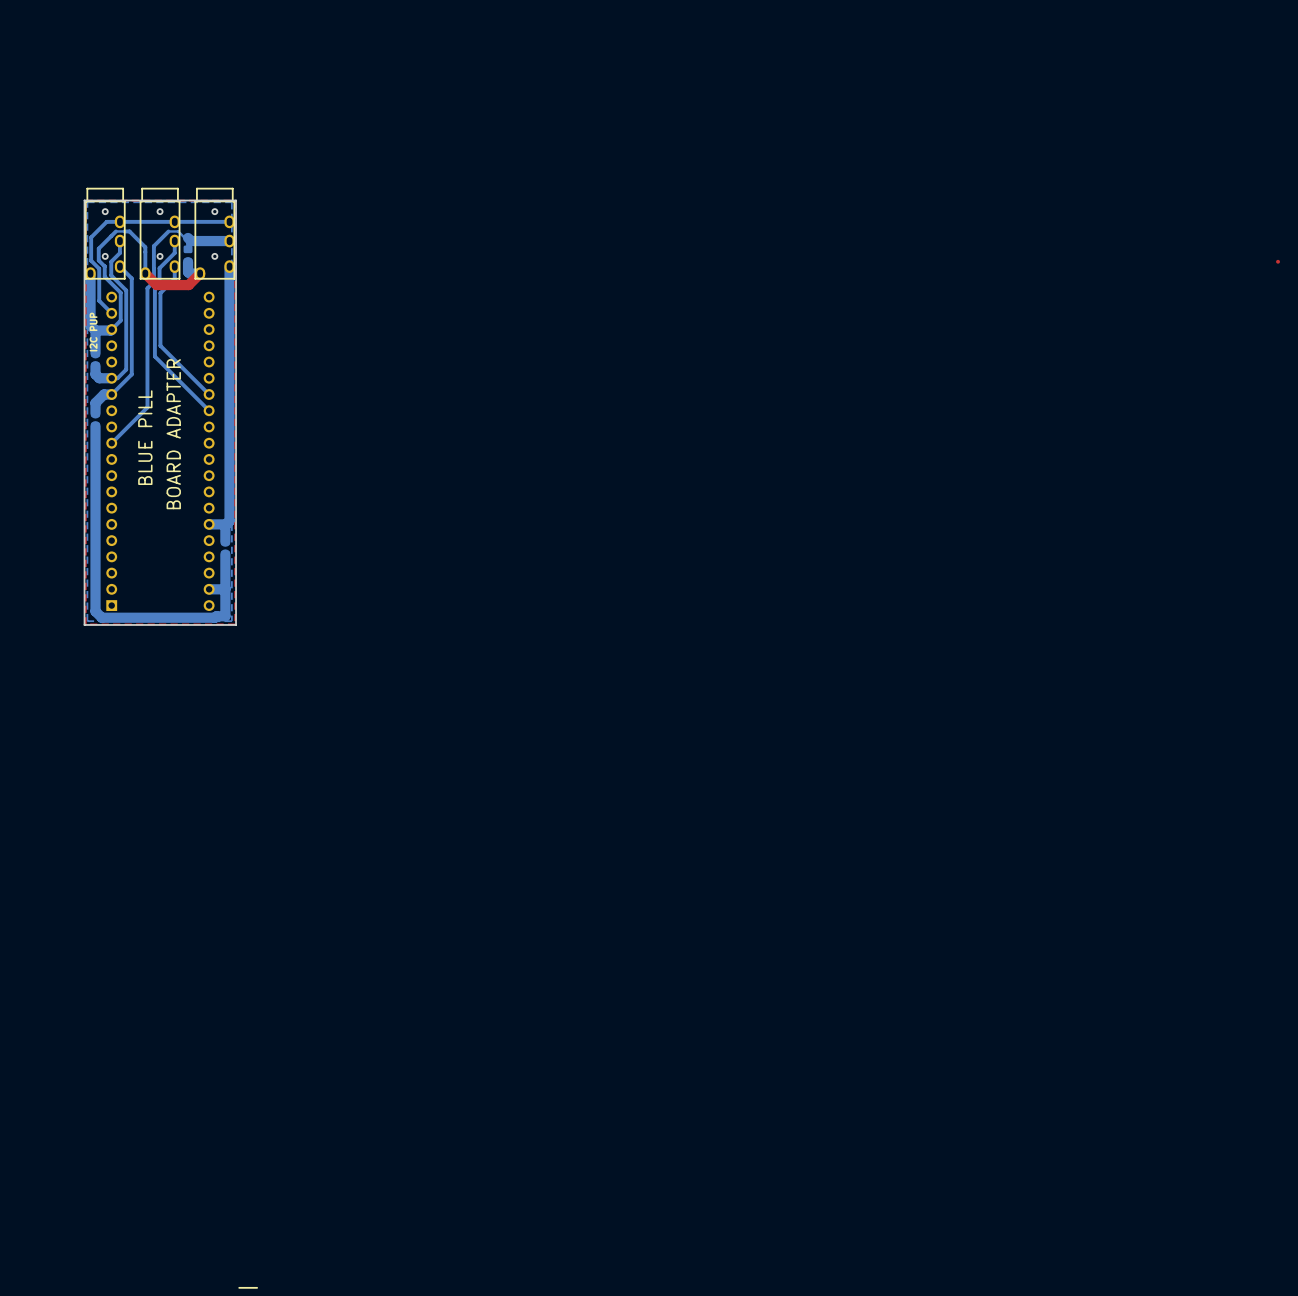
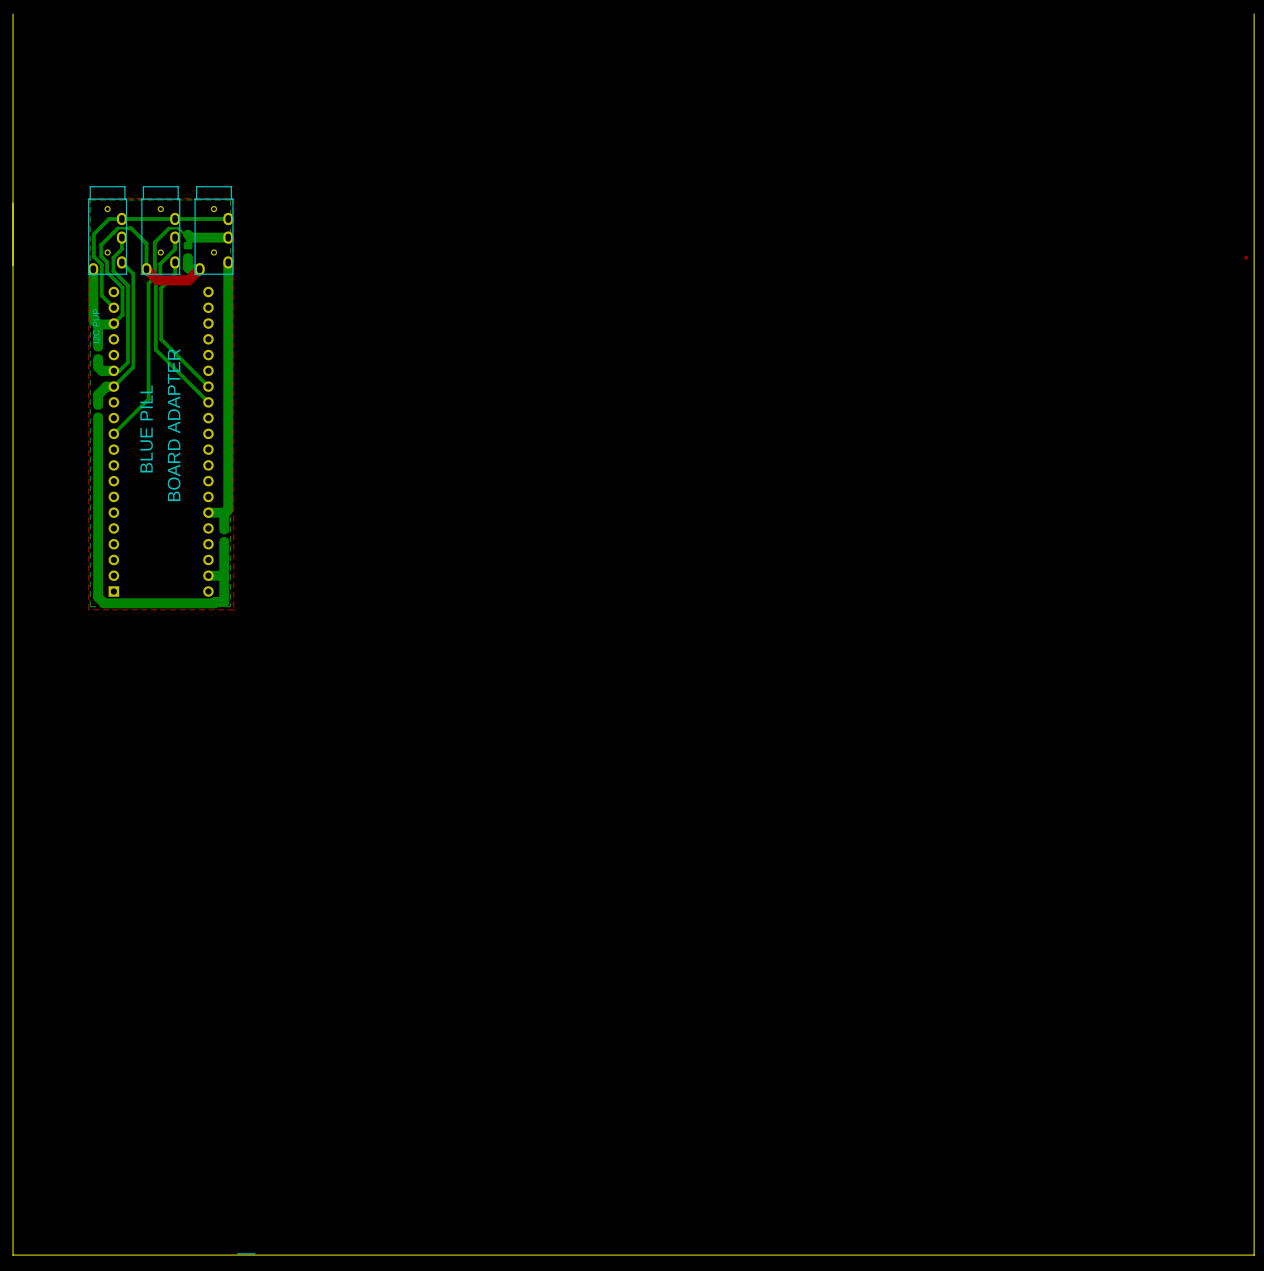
board edge: none -> (13, 13) (13, 1255) (1254, 1255) (1254, 13)
board edge: (84, 200) (236, 200) (236, 624) (84, 624) (84, 200) -> none

